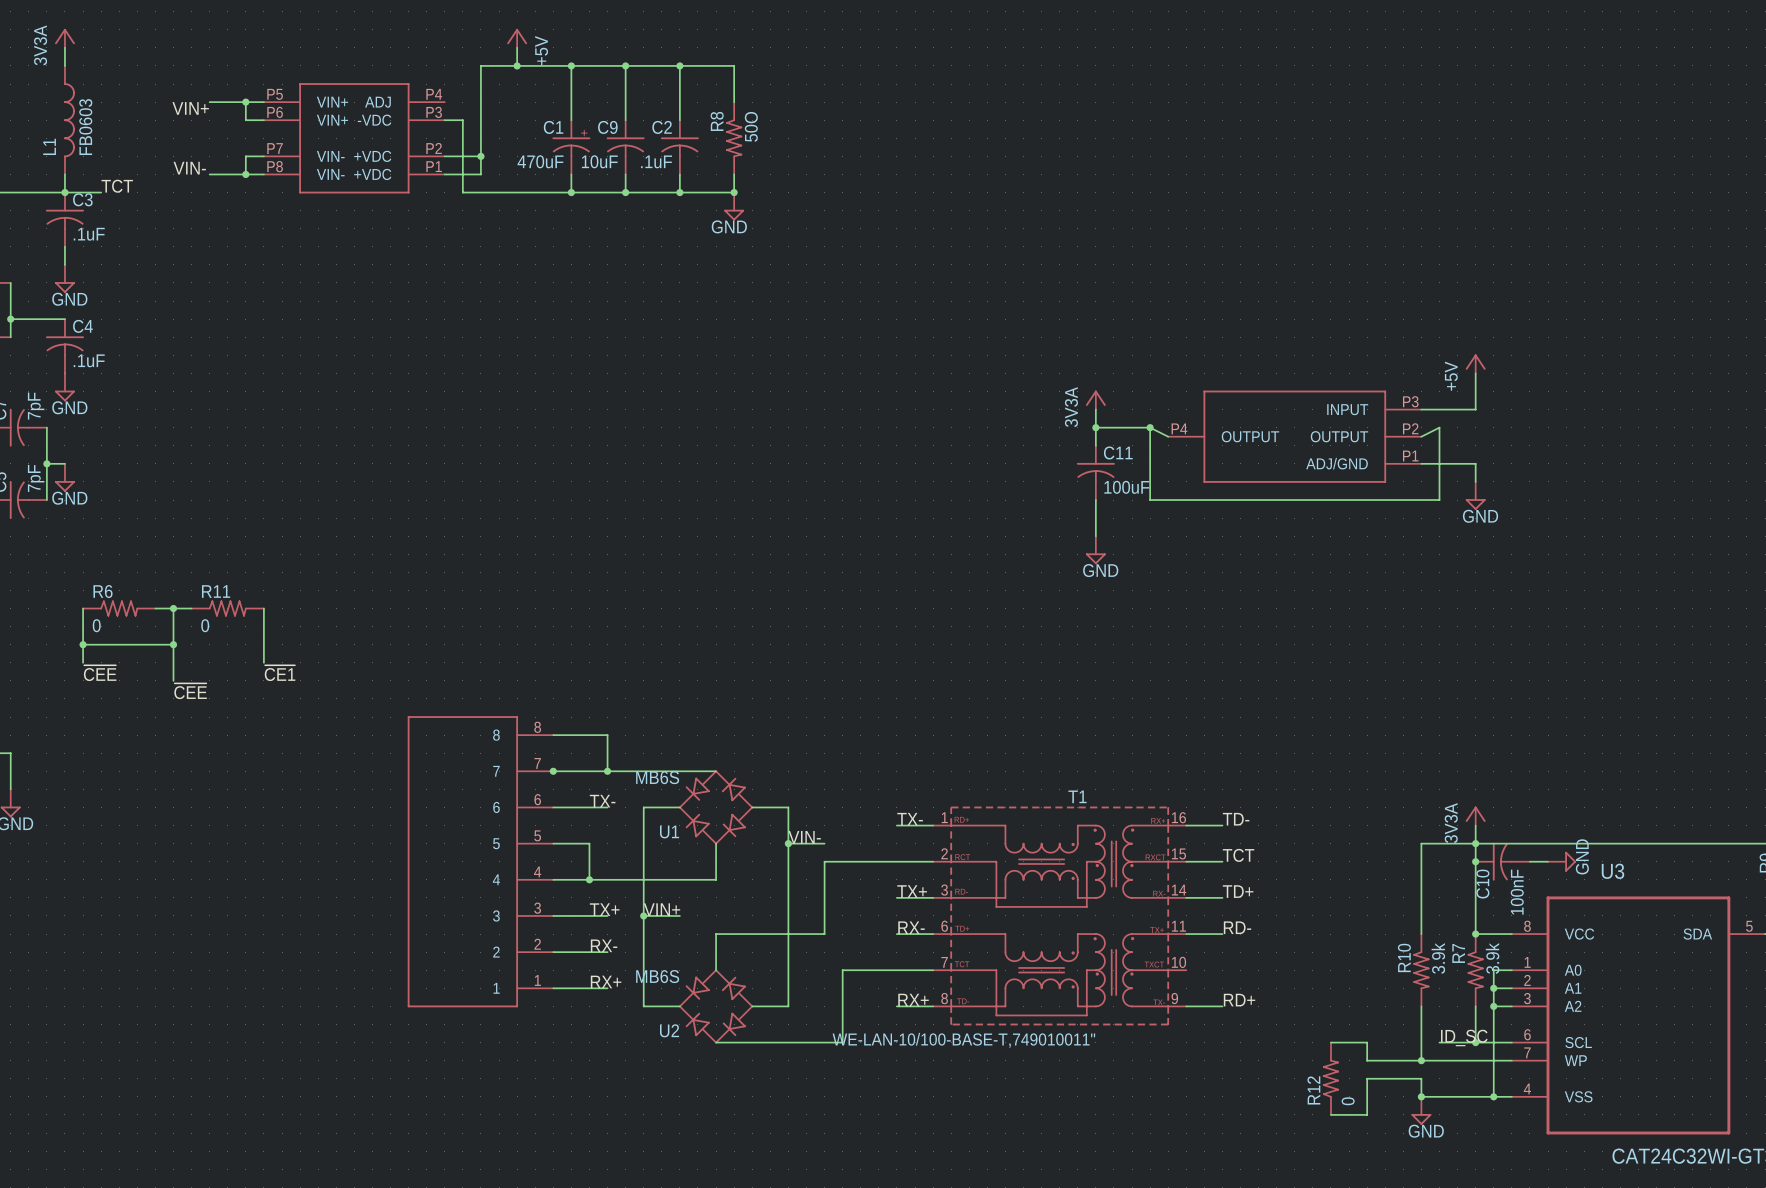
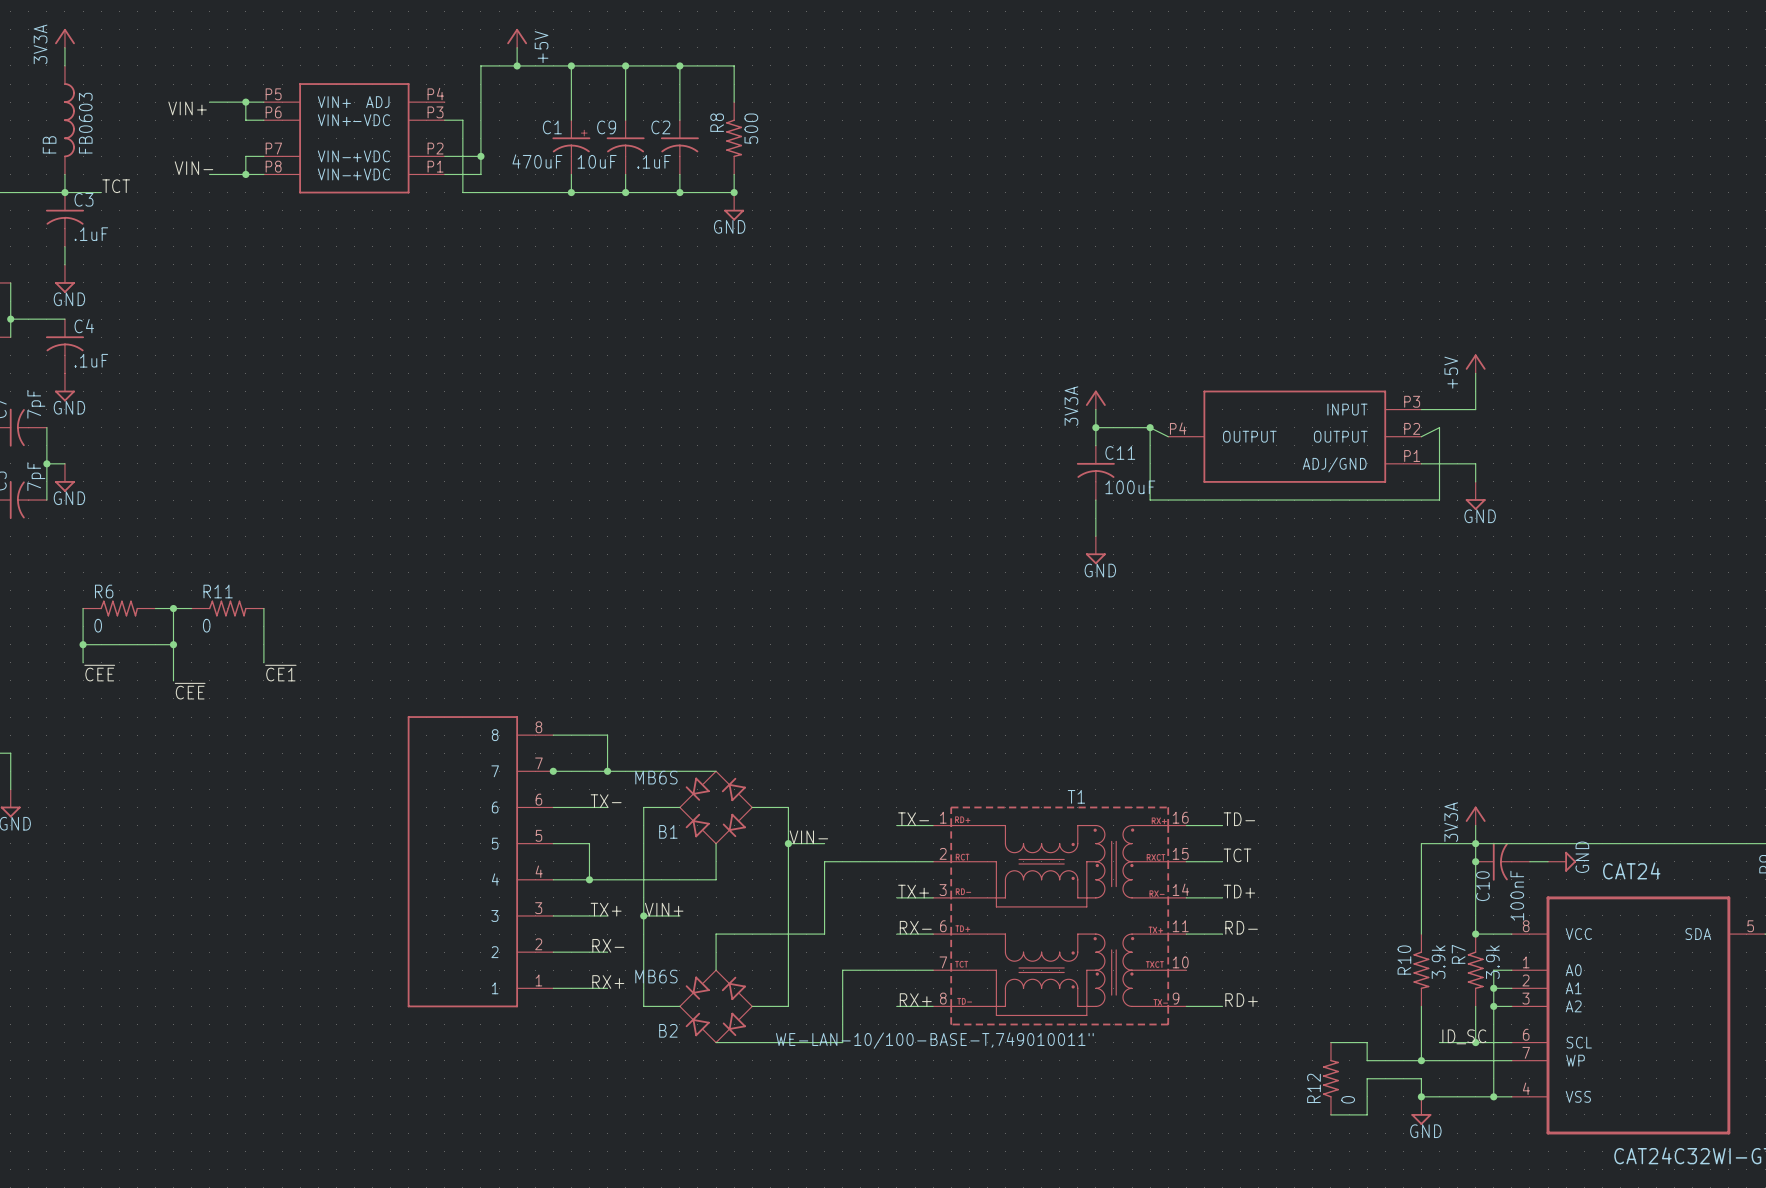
L1 name: L1 (49, 146) -> FB (49, 144)
U1 name: U1 (669, 831) -> B1 (668, 831)
U3 name: U3 (1613, 871) -> CAT24 (1631, 870)
U2 name: U2 (669, 1030) -> B2 (668, 1030)

